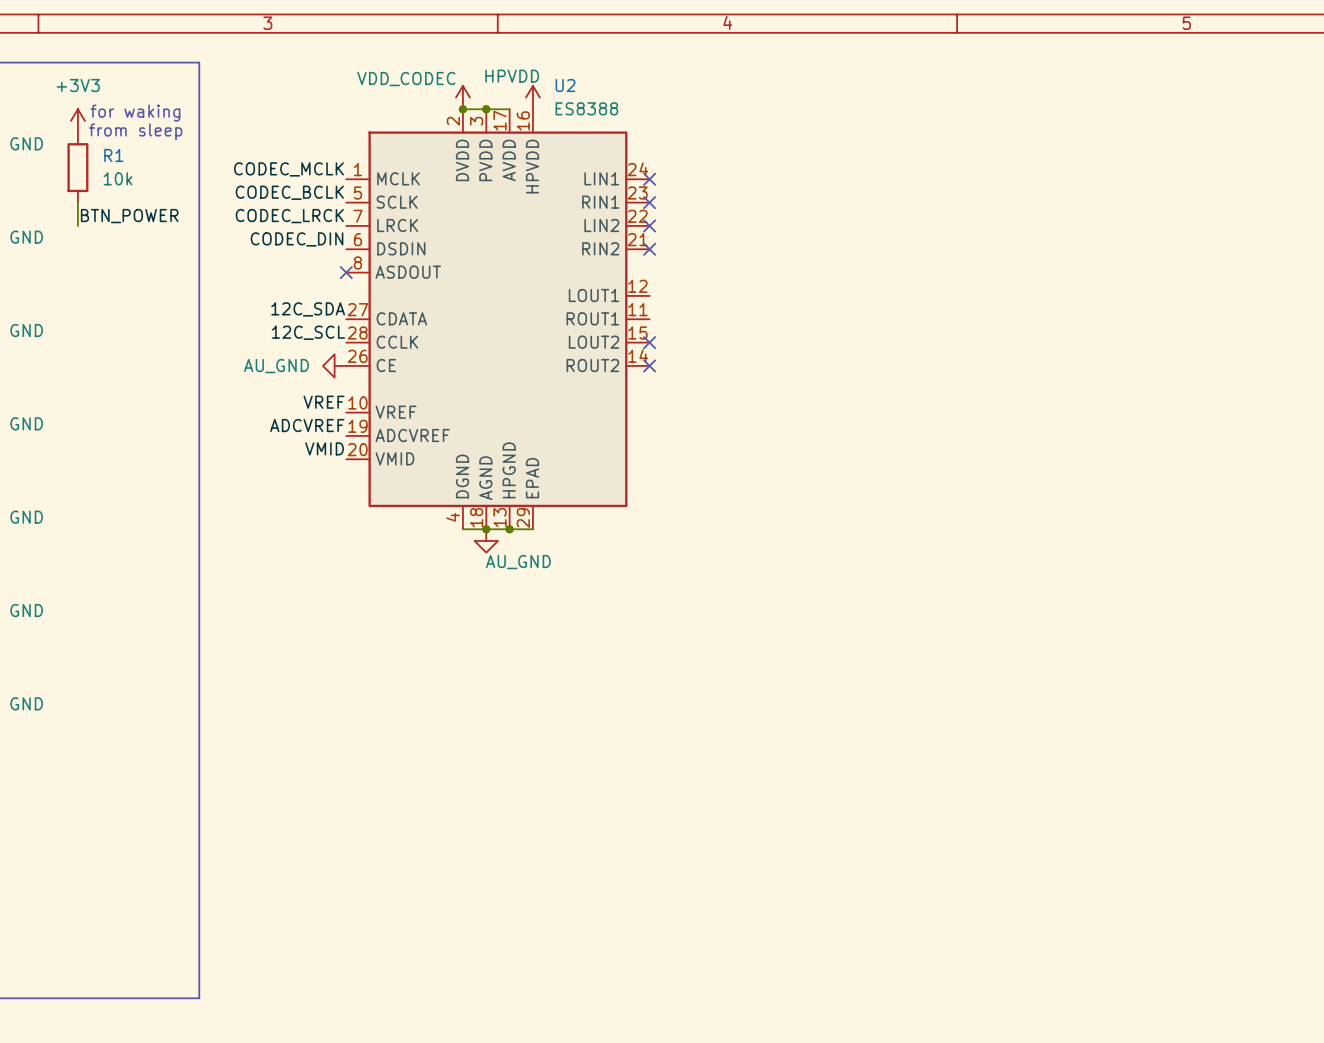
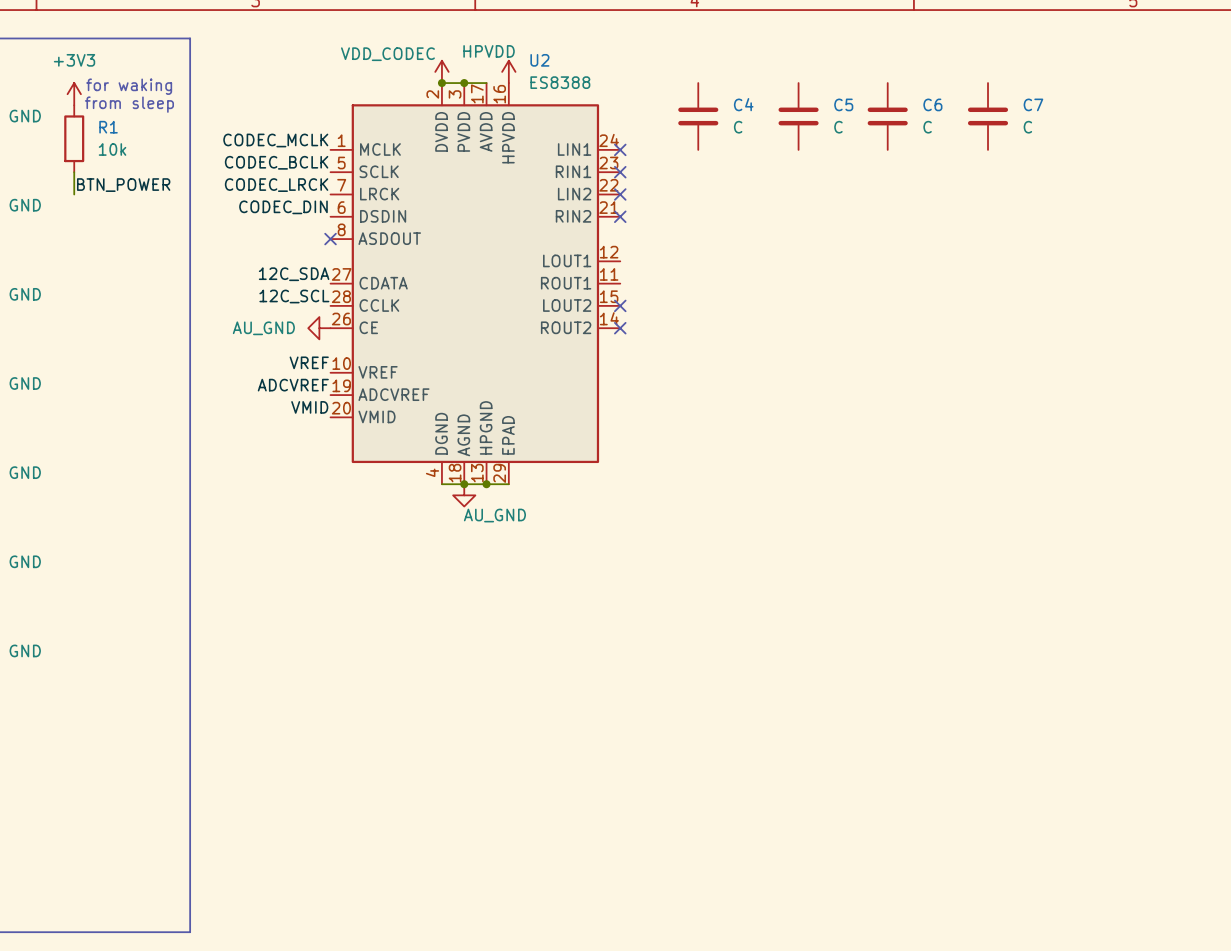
C4: none -> C (698, 116)
C5: none -> C (798, 116)
C6: none -> C (887, 116)
C7: none -> C (988, 116)

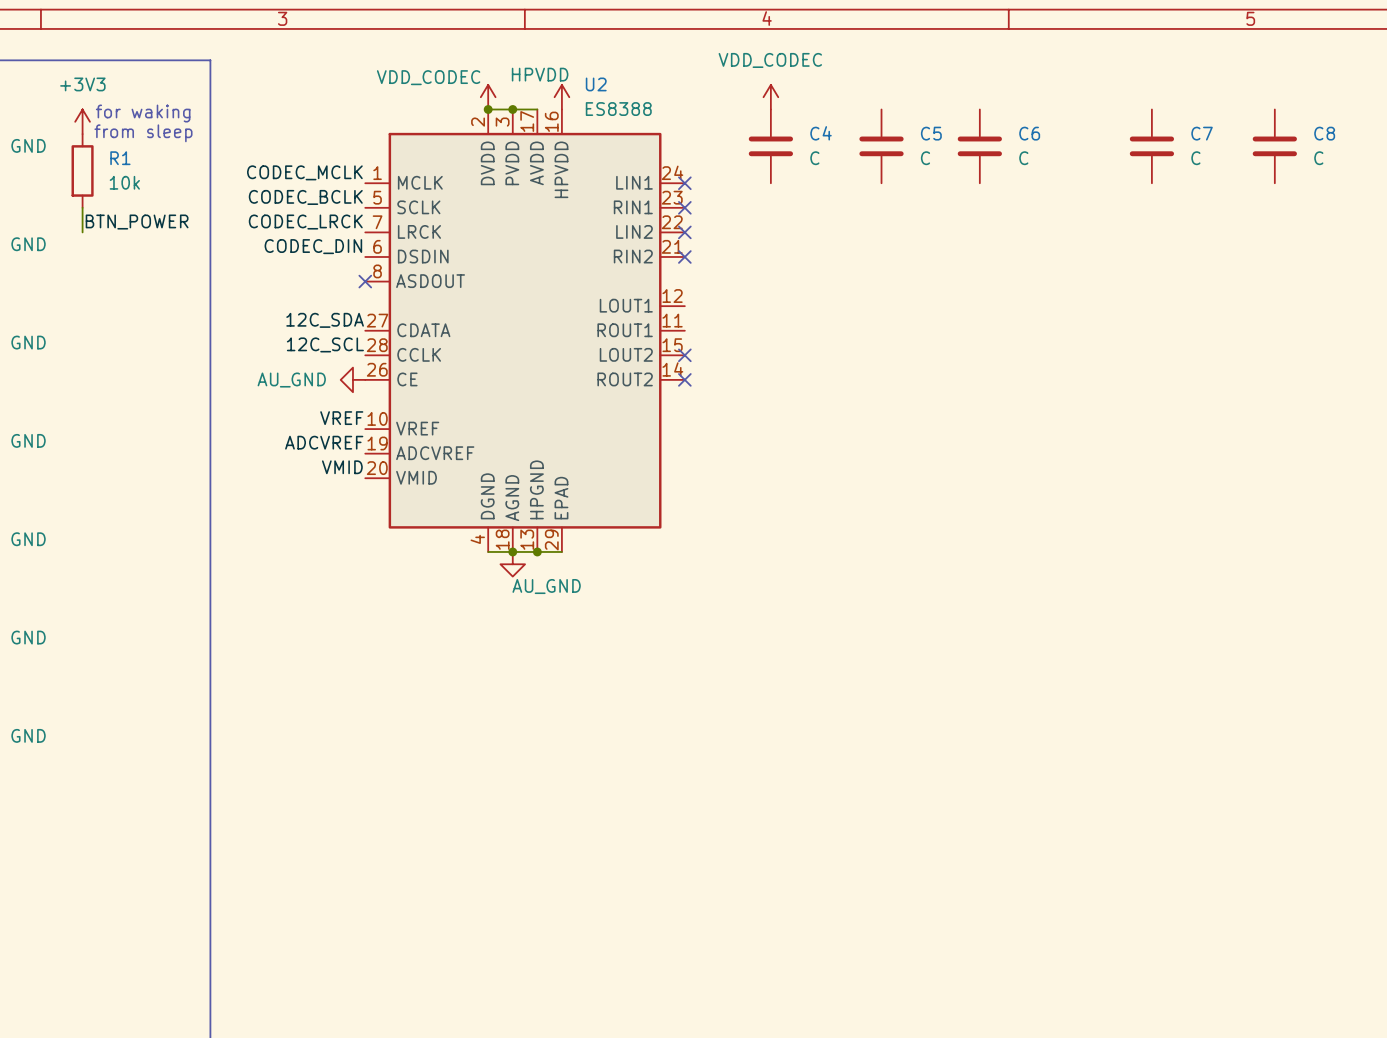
power symbol: none -> VDD_CODEC (770, 97)
C7 position: (988, 116) -> (1151, 146)
C8: none -> C (1274, 146)

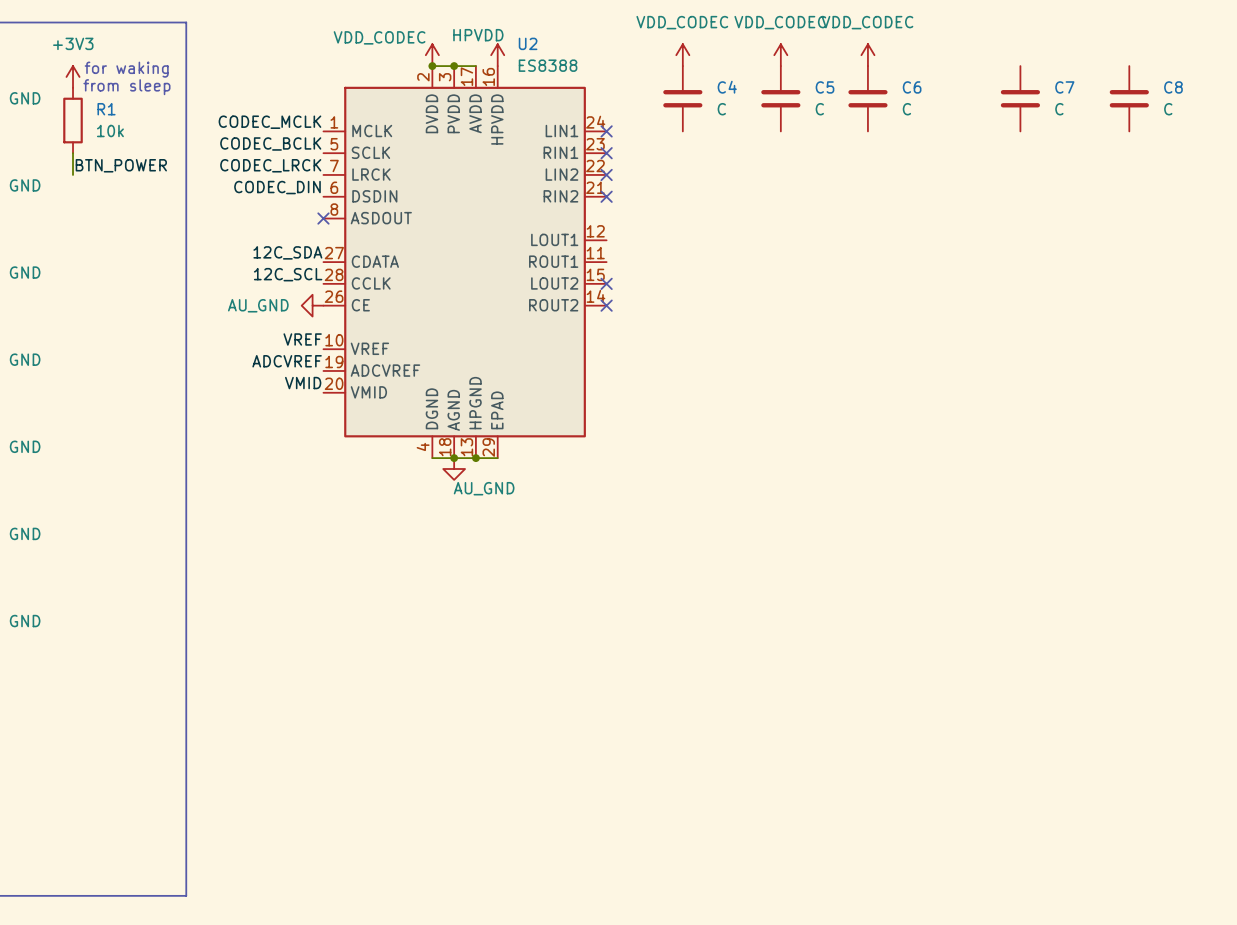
power symbol: none -> VDD_CODEC (780, 55)
power symbol: none -> VDD_CODEC (867, 55)

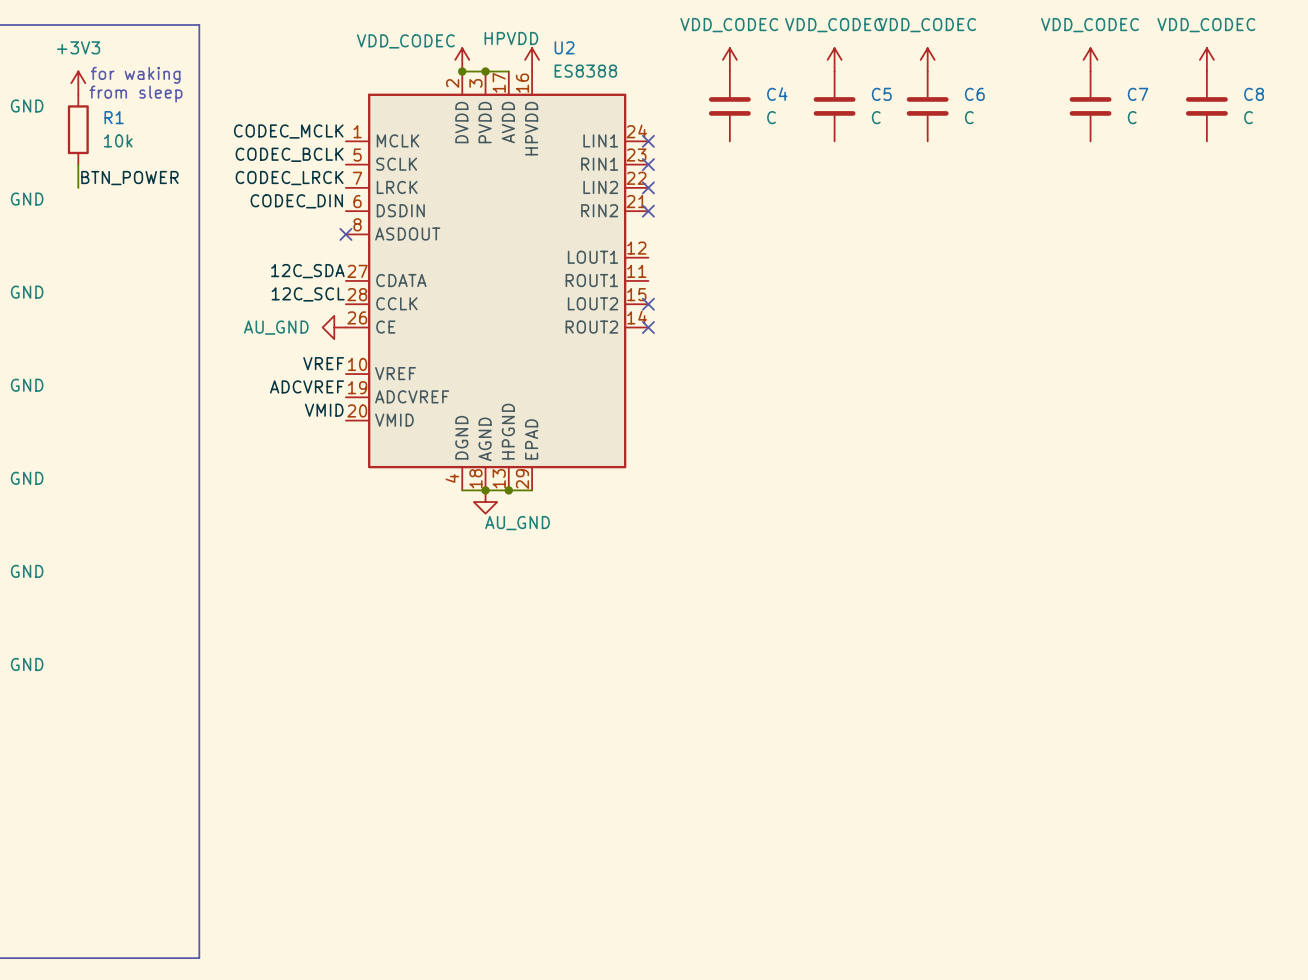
power symbol: none -> VDD_CODEC (1090, 59)
power symbol: none -> VDD_CODEC (1206, 59)

